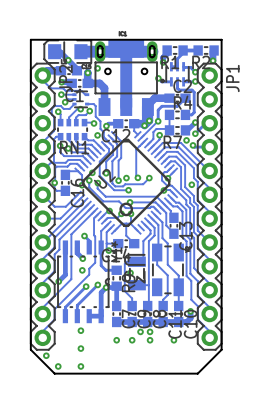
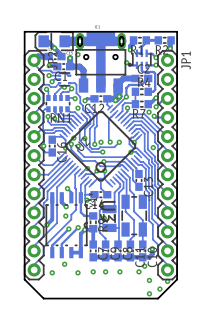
via: (140, 331) -> none
via: (150, 331) -> none
via: none -> (144, 266)
via: none -> (52, 272)
via: none -> (77, 272)
via: (80, 348) -> none
via: none -> (149, 280)
via: none -> (167, 281)
via: (46, 355) -> none
via: none -> (159, 289)
via: (58, 366) -> none
via: (80, 366) -> none
via: none -> (149, 293)

